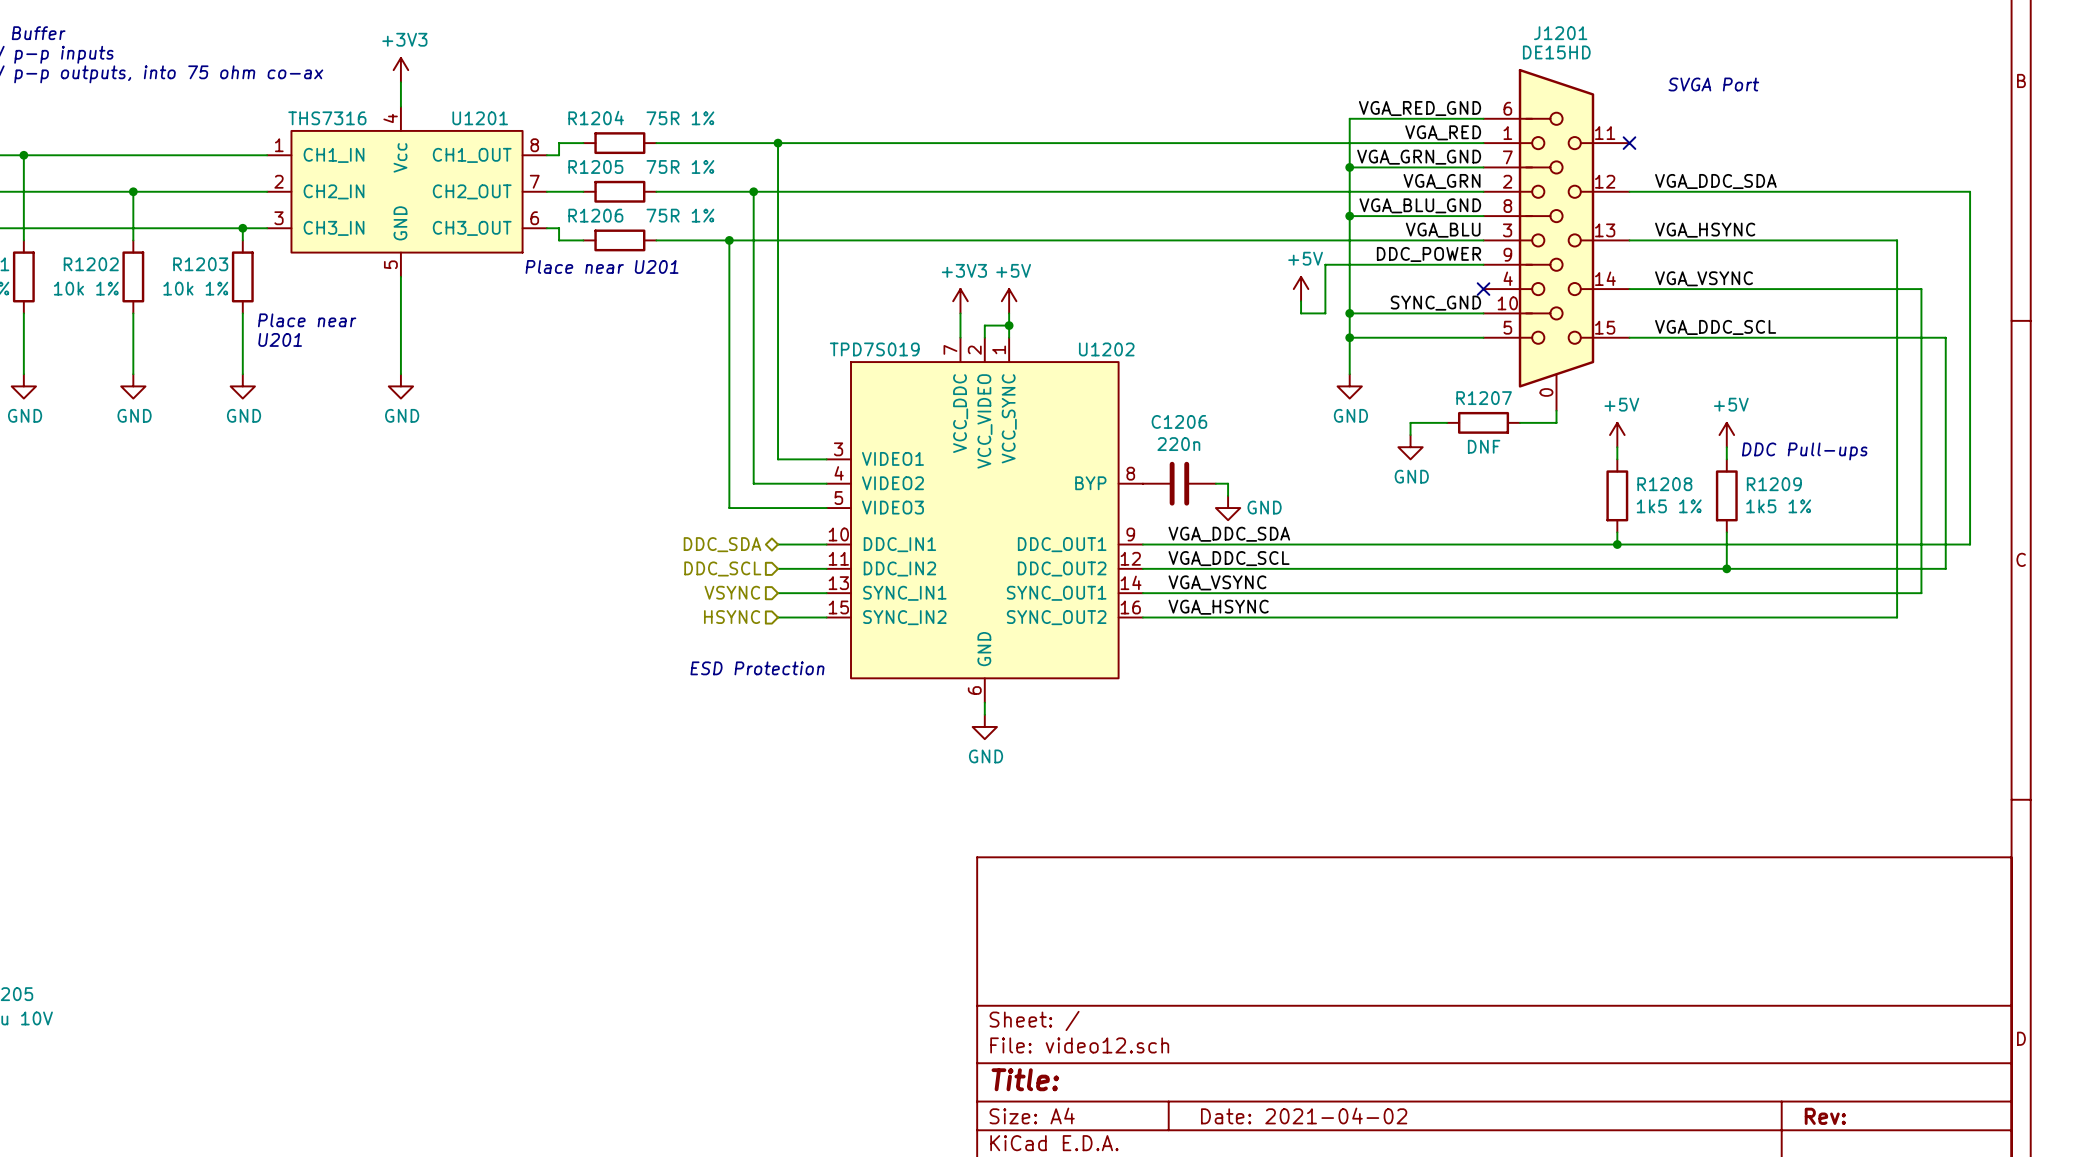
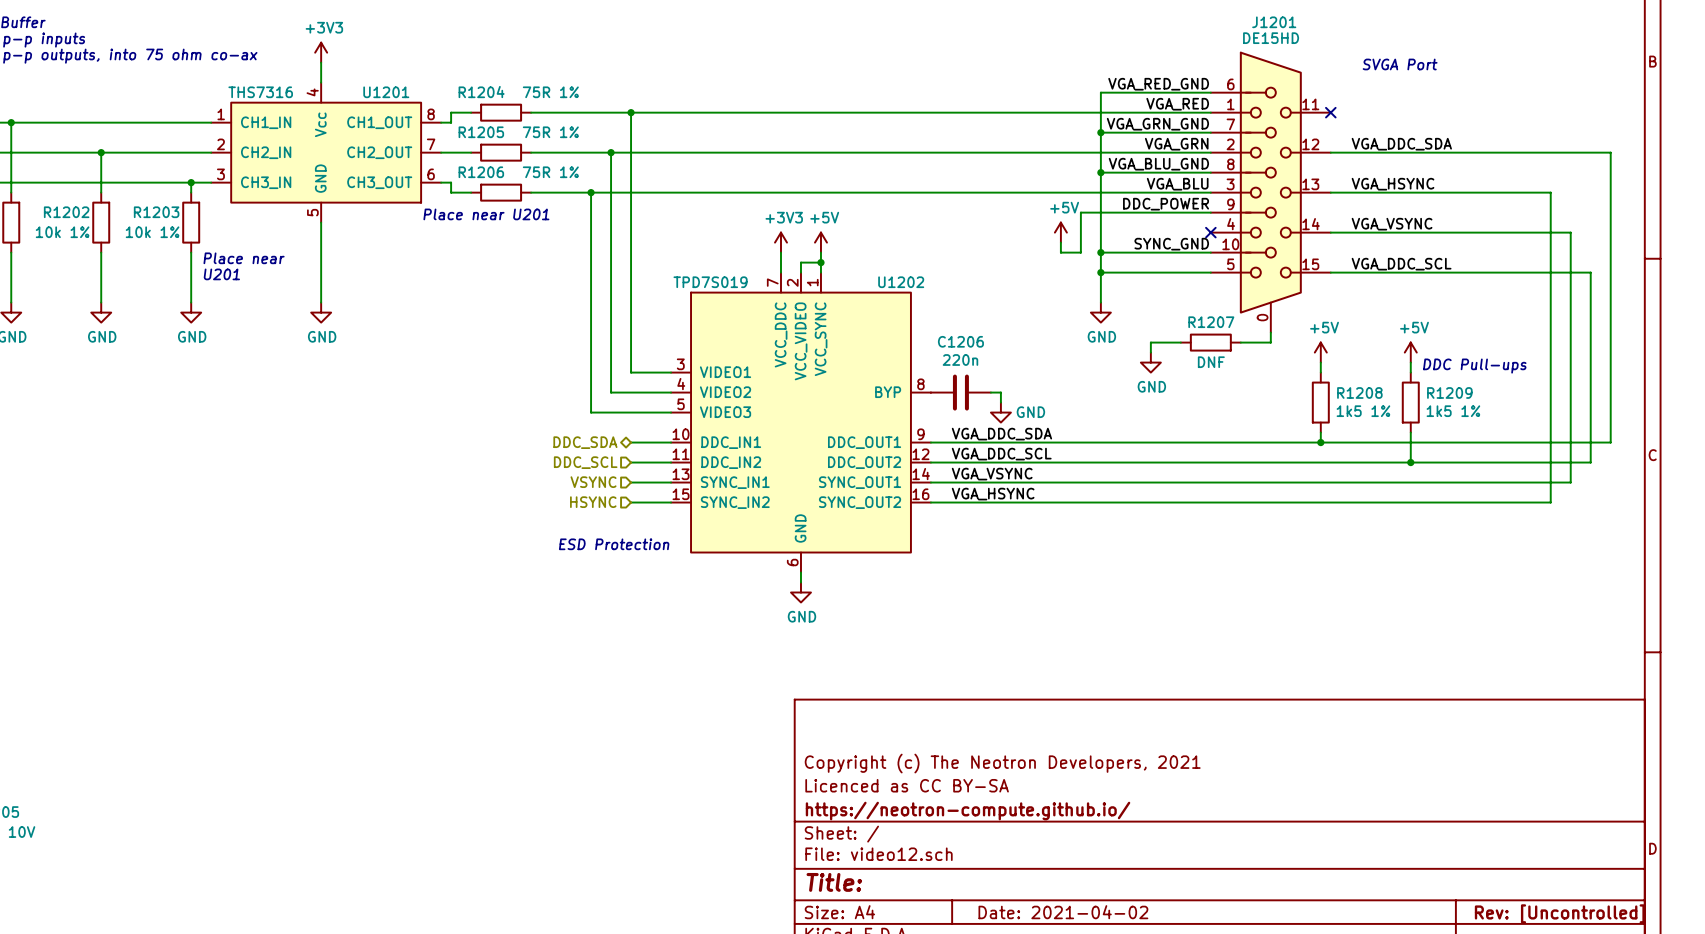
title block: none -> Copyright (c) The Neotron Developers, 2021 (1002, 763)
title block: none -> Licenced as CC BY-SA (907, 785)
title block: none -> https://neotron-compute.github.io/ (968, 811)
title block: Rev: (1825, 1116) -> Rev: [Uncontrolled] (1559, 913)

